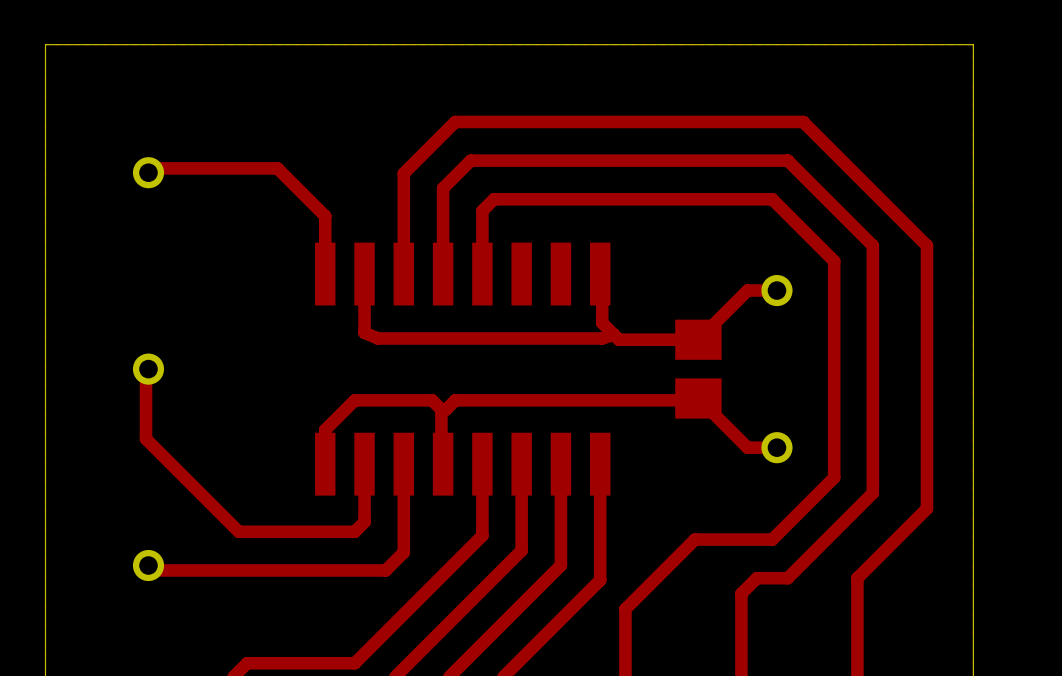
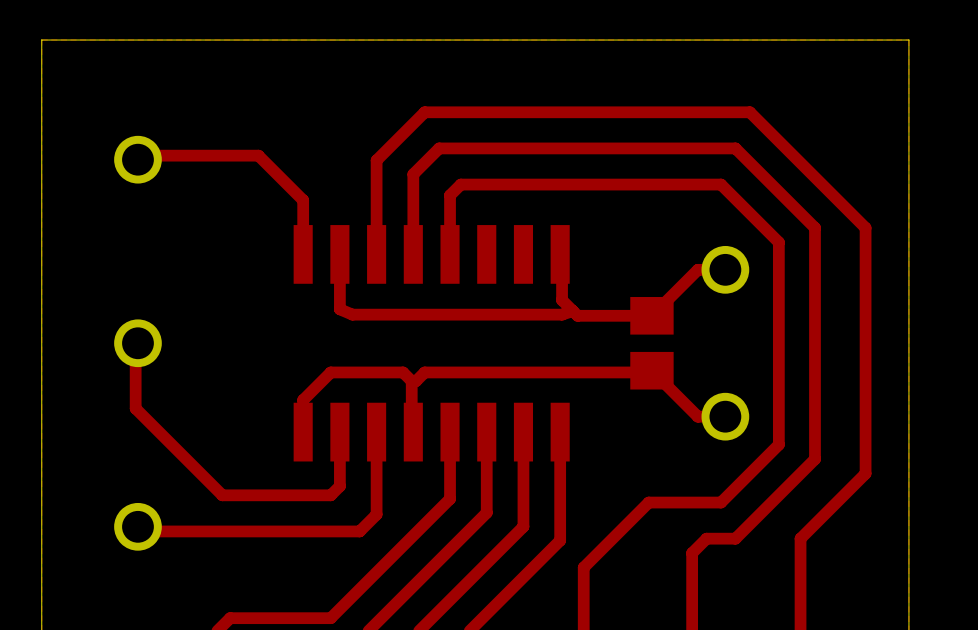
part footprint: [132, 157, 165, 189] -> [114, 135, 162, 184]
part footprint: [761, 274, 793, 307] -> [701, 245, 750, 294]
part footprint: [132, 353, 165, 385] -> [114, 319, 162, 368]
part footprint: [761, 432, 793, 464] -> [701, 392, 750, 441]
part footprint: [132, 549, 165, 582] -> [114, 502, 162, 551]

